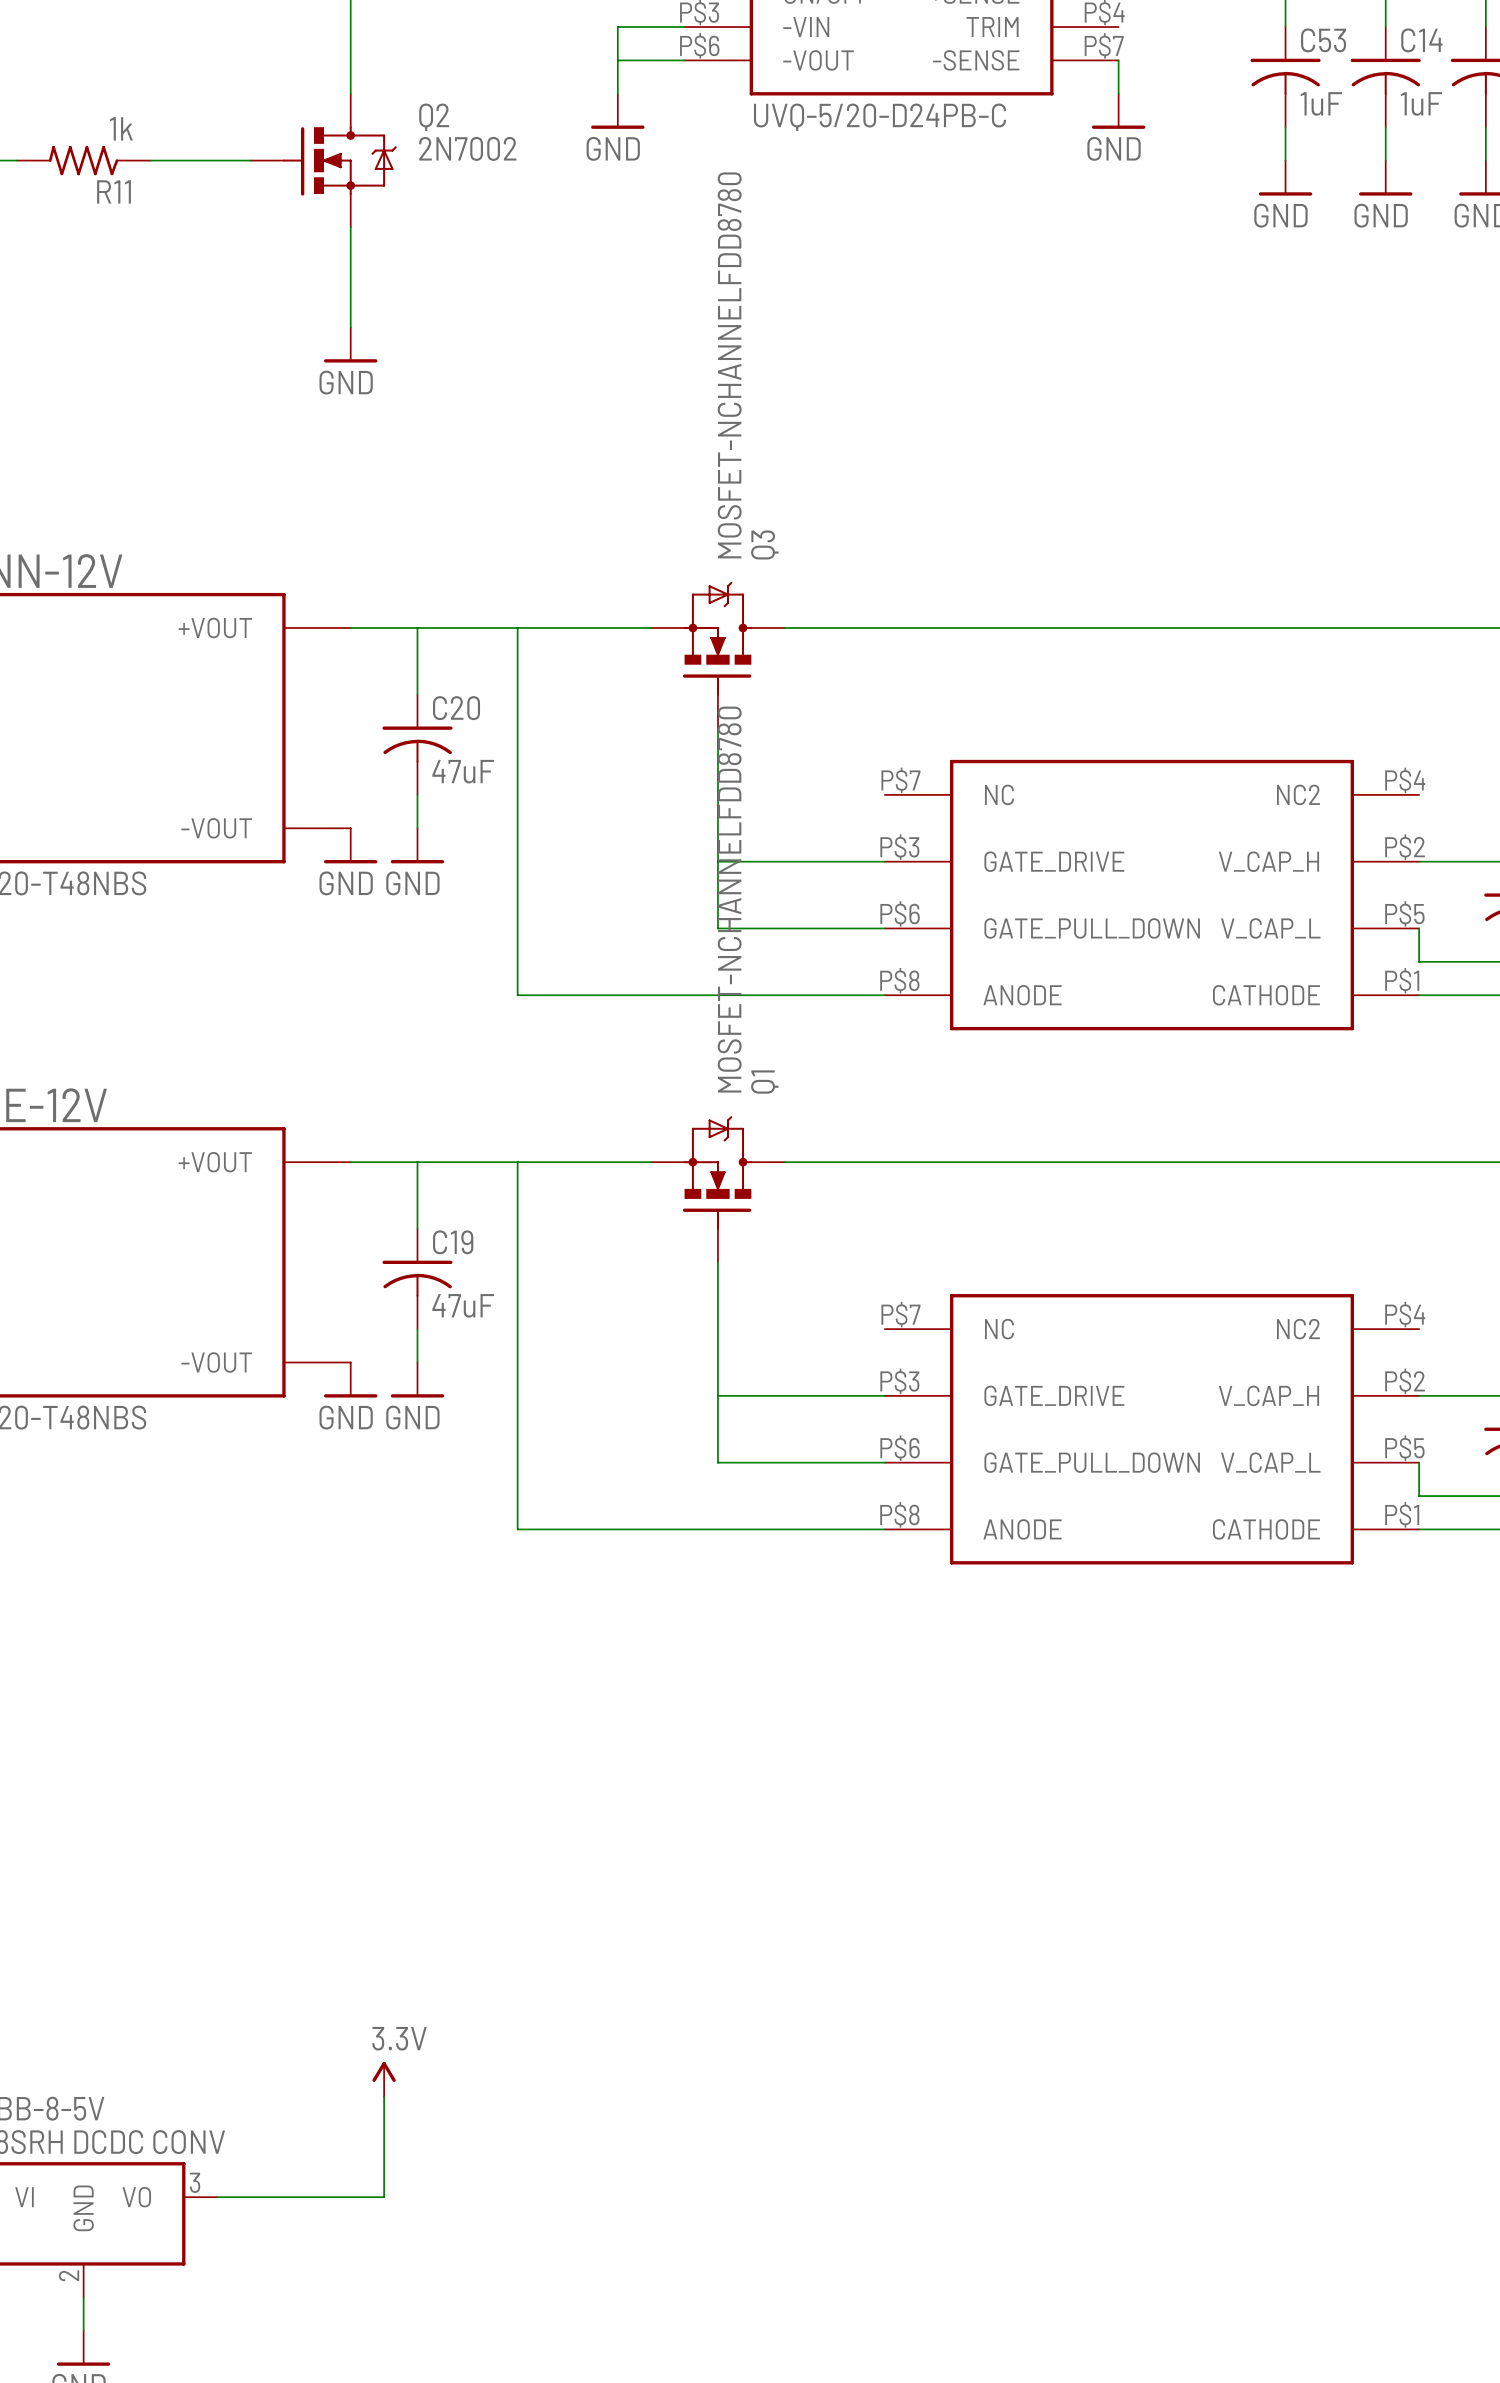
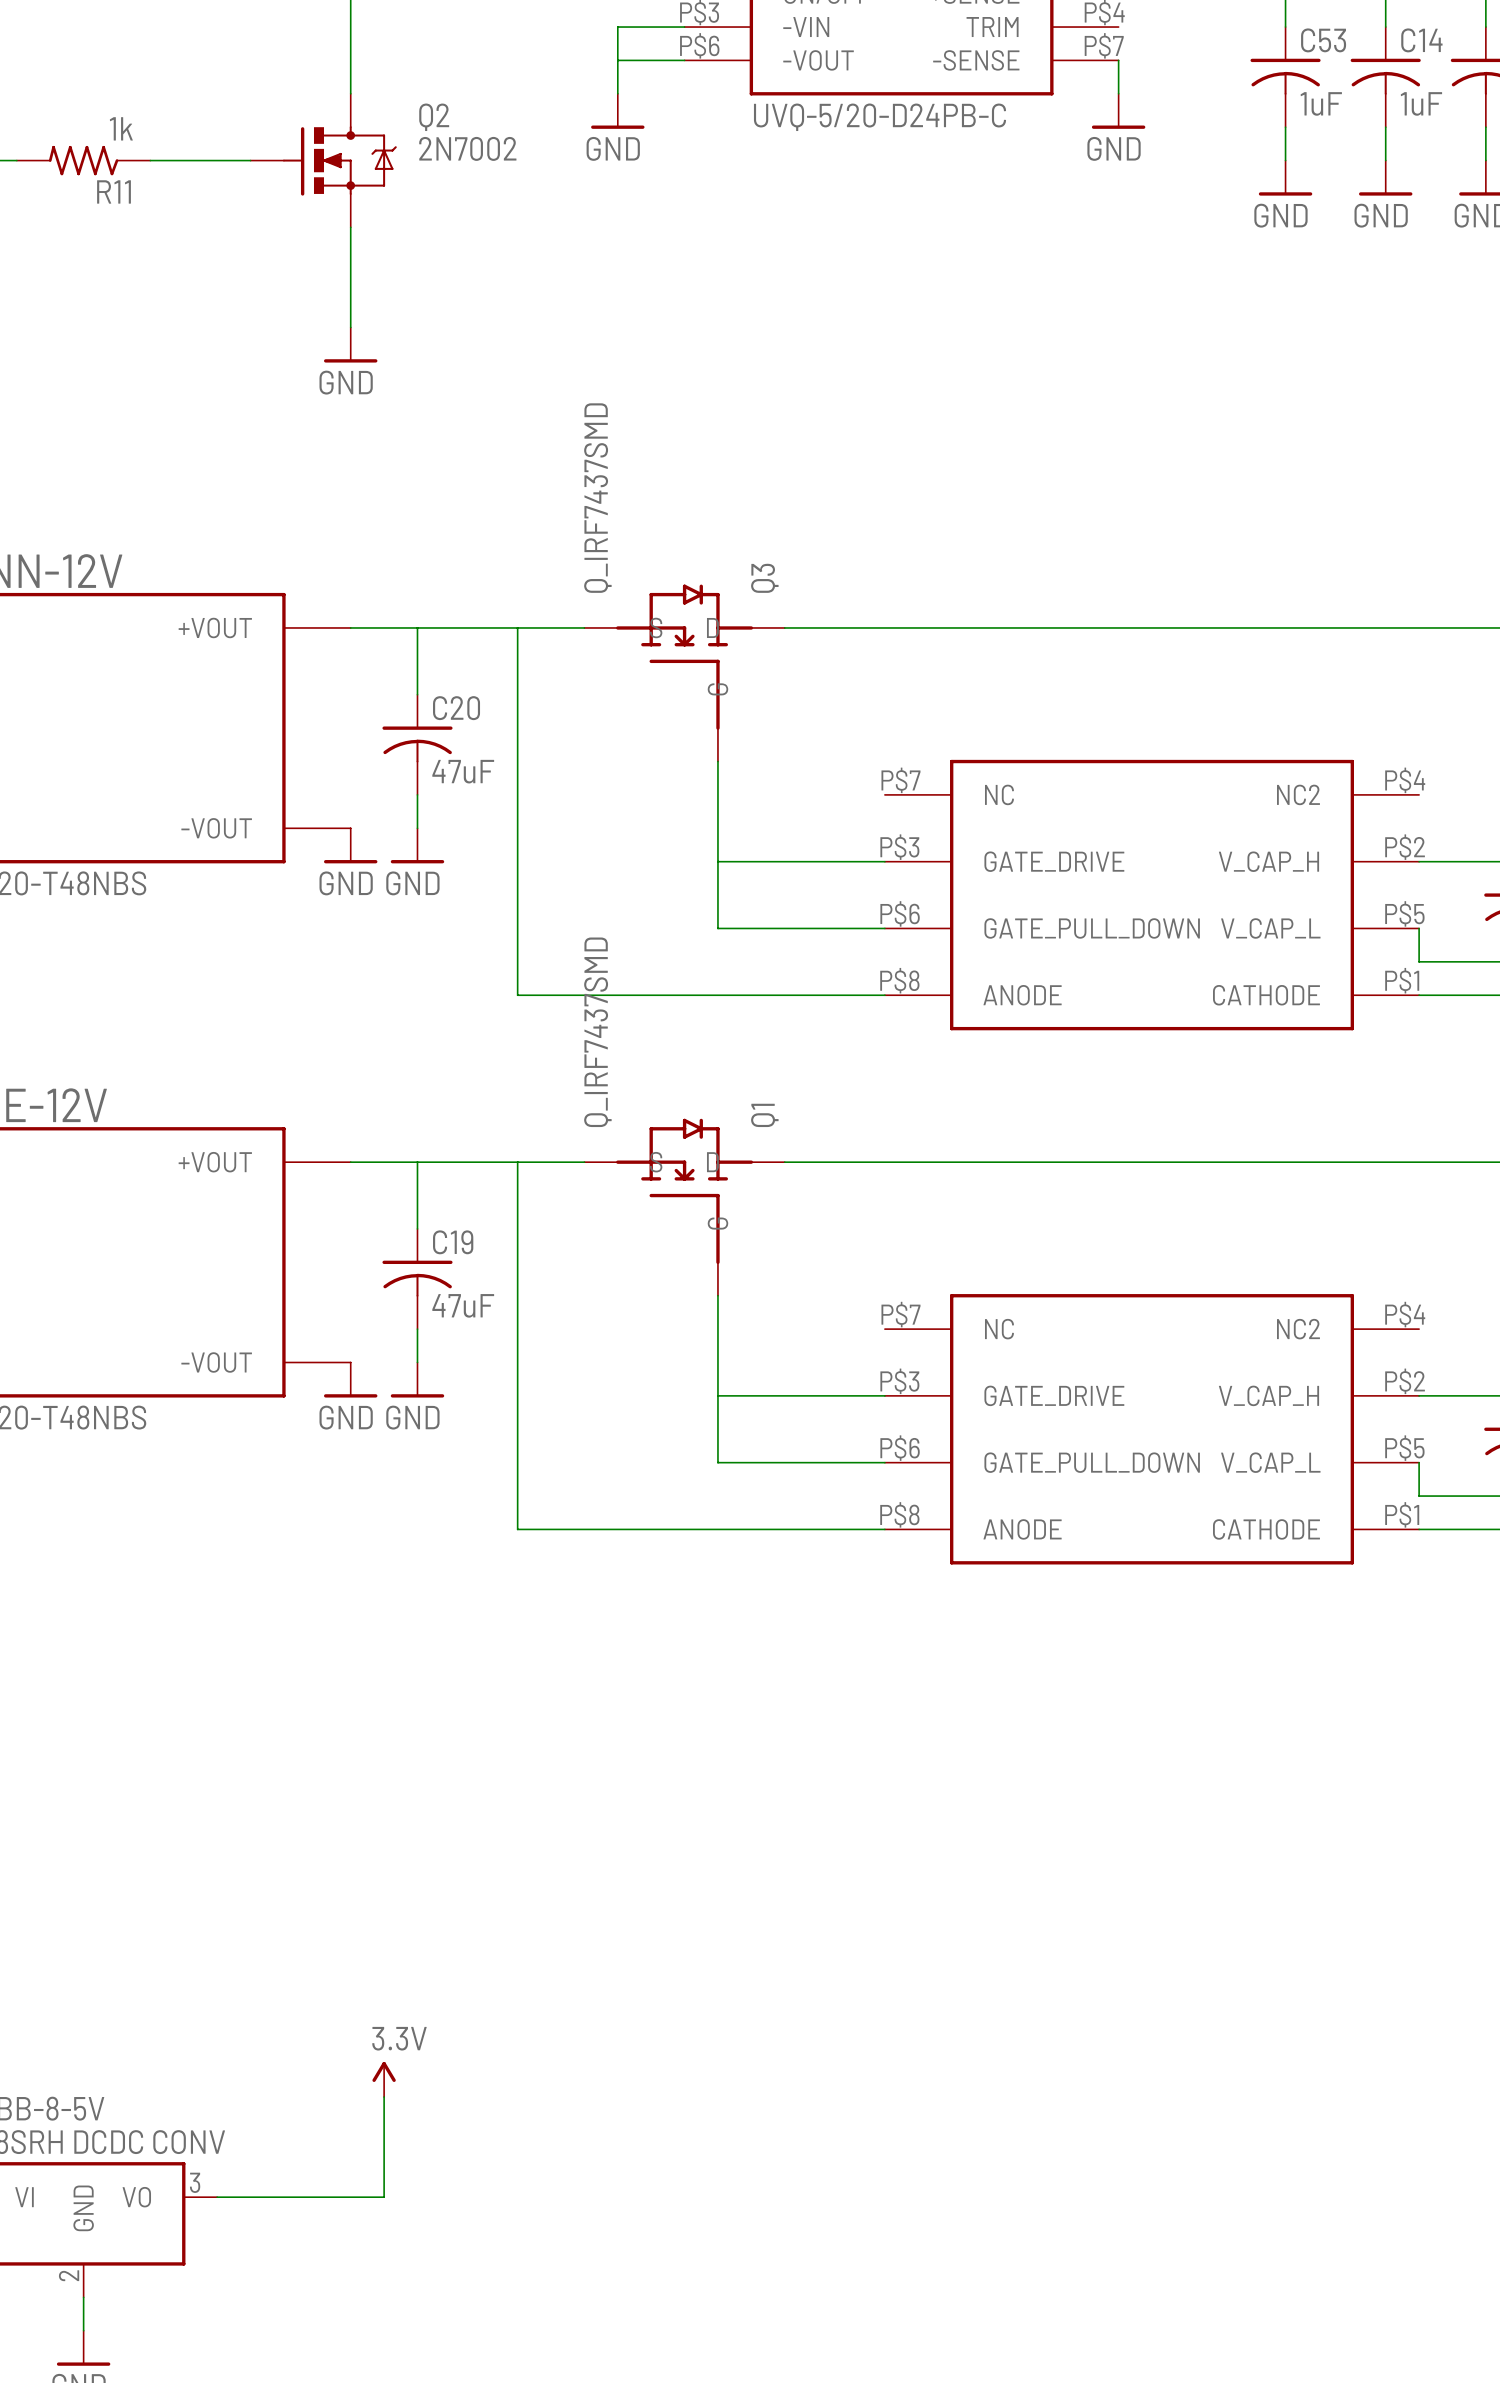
Q3 value: MOSFET-NCHANNELFDD8780 (729, 365) -> Q_IRF7437SMD (597, 498)
Q3 name position: Q3 (764, 544) -> Q3 (764, 578)
Q3 symbol: [651, 581, 785, 729] -> [584, 584, 785, 762]
Q1 value: MOSFET-NCHANNELFDD8780 (729, 899) -> Q_IRF7437SMD (597, 1032)
Q1 name position: Q1 (764, 1082) -> Q1 (764, 1115)
Q1 symbol: [651, 1116, 785, 1263] -> [584, 1118, 785, 1296]

